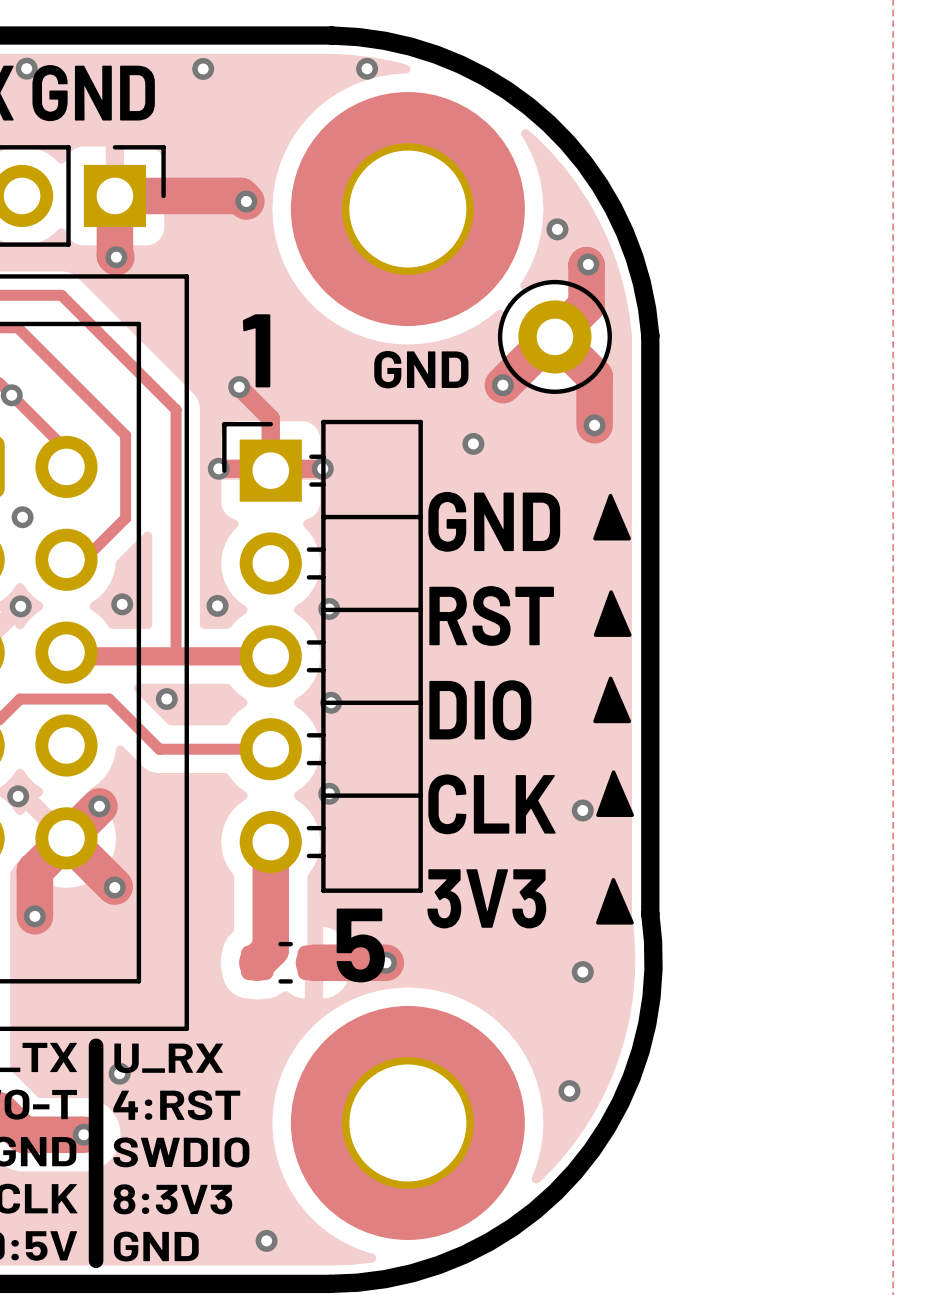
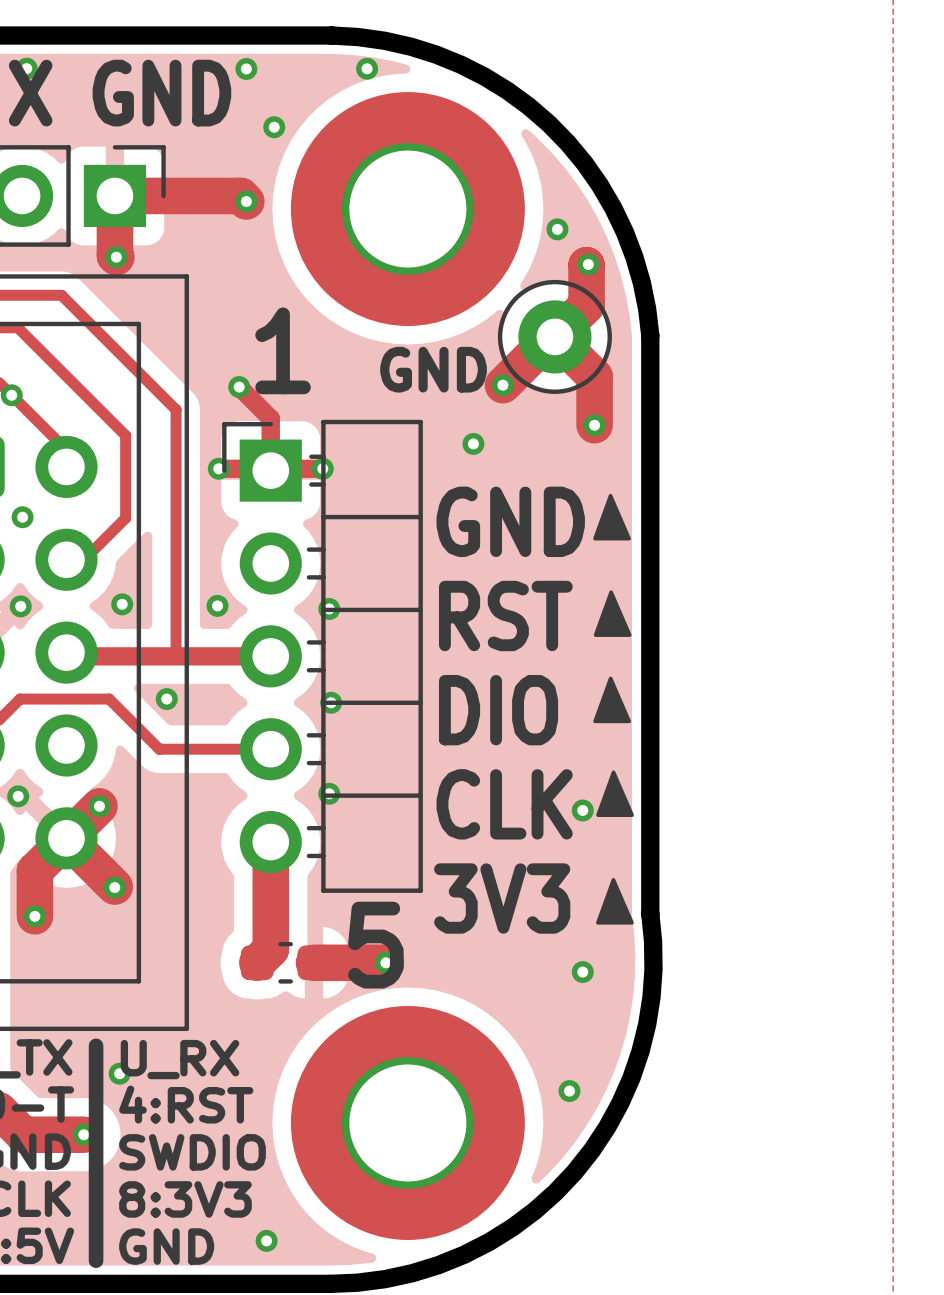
via position: (203, 68) -> (246, 68)
via: none -> (274, 127)

